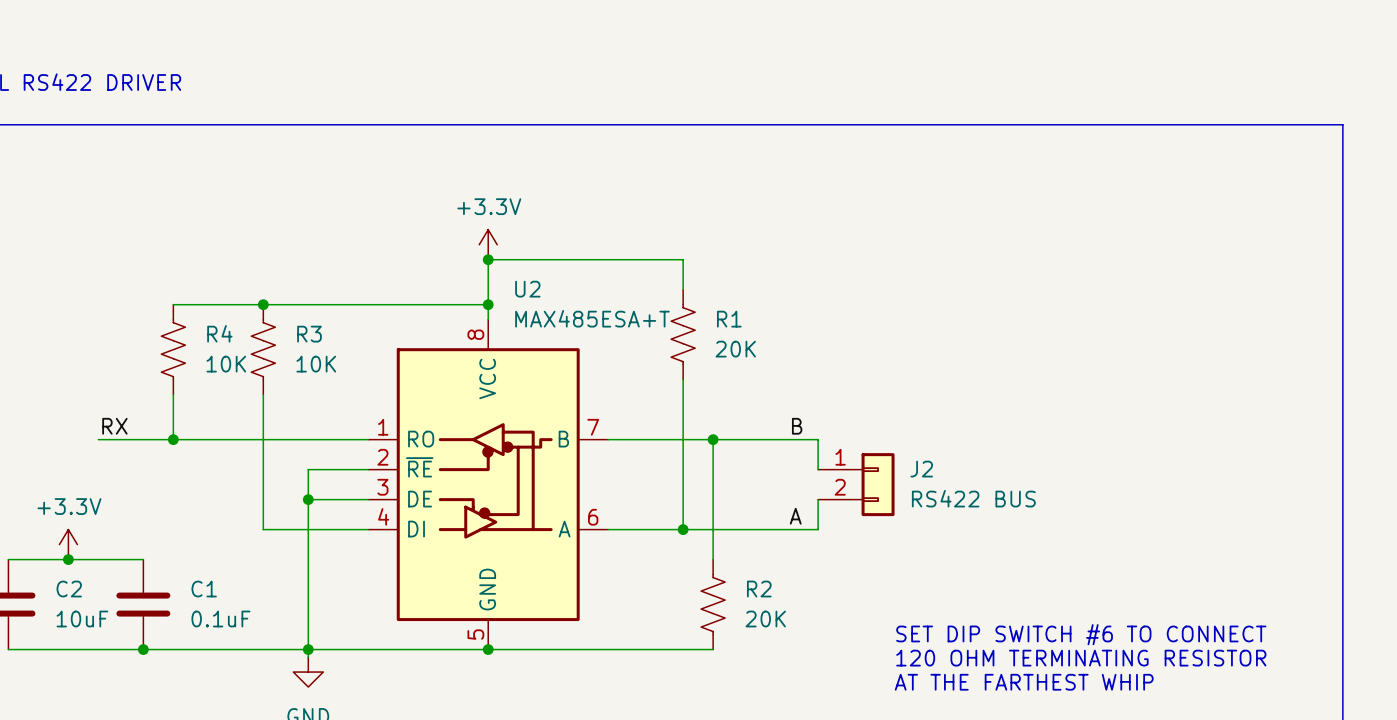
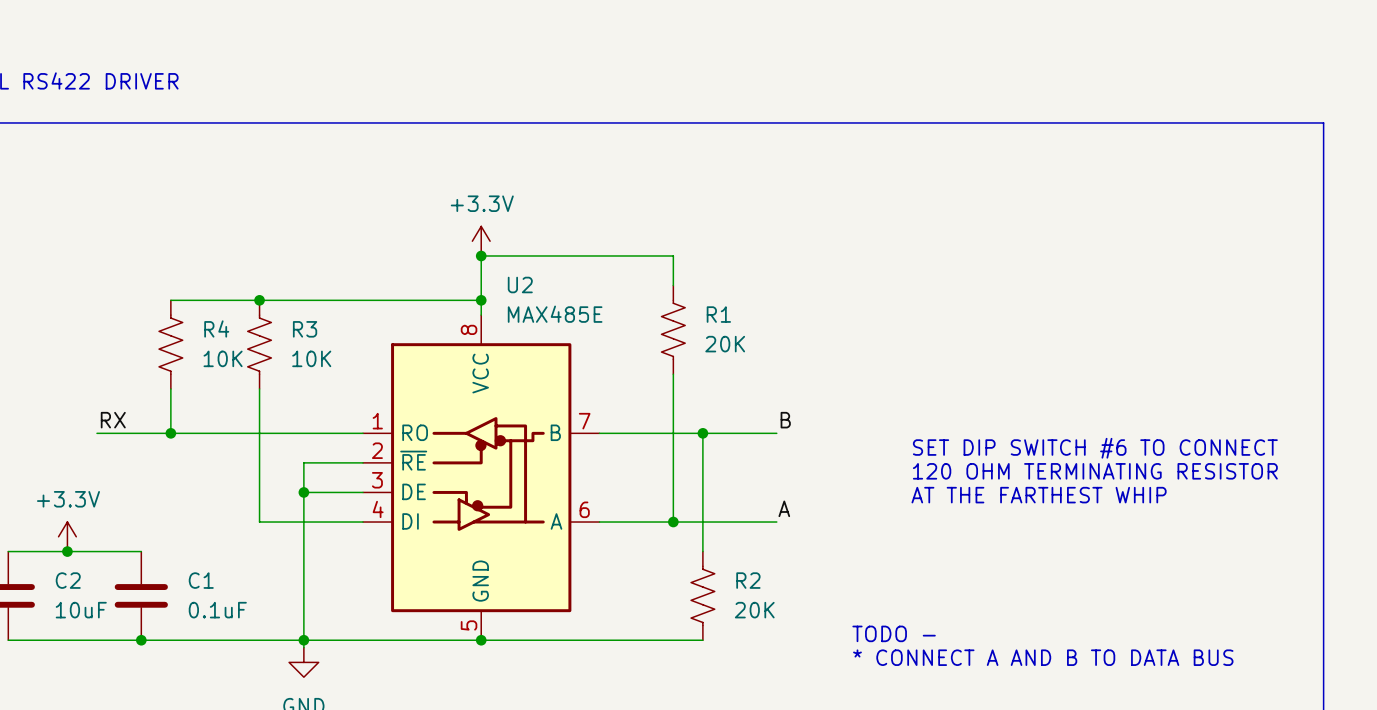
U2 value: MAX485ESA+T (592, 318) -> MAX485E (555, 314)
wire: (788, 439) (818, 439) (818, 469) -> none
J2: RS422 BUS (856, 484) -> none
wire: (818, 499) (818, 529) (788, 529) -> none
text position: SET DIP SWITCH #6 TO CONNECT (1081, 634) -> SET DIP SWITCH #6 TO CONNECT (1095, 448)
text: none -> TODO - (894, 633)
text position: 120 OHM TERMINATING RESISTOR (1081, 658) -> 120 OHM TERMINATING RESISTOR (1095, 471)
text: none -> * CONNECT A AND B TO DATA BUS (1043, 657)
text position: AT THE FARTHEST WHIP (1024, 682) -> AT THE FARTHEST WHIP (1039, 495)

